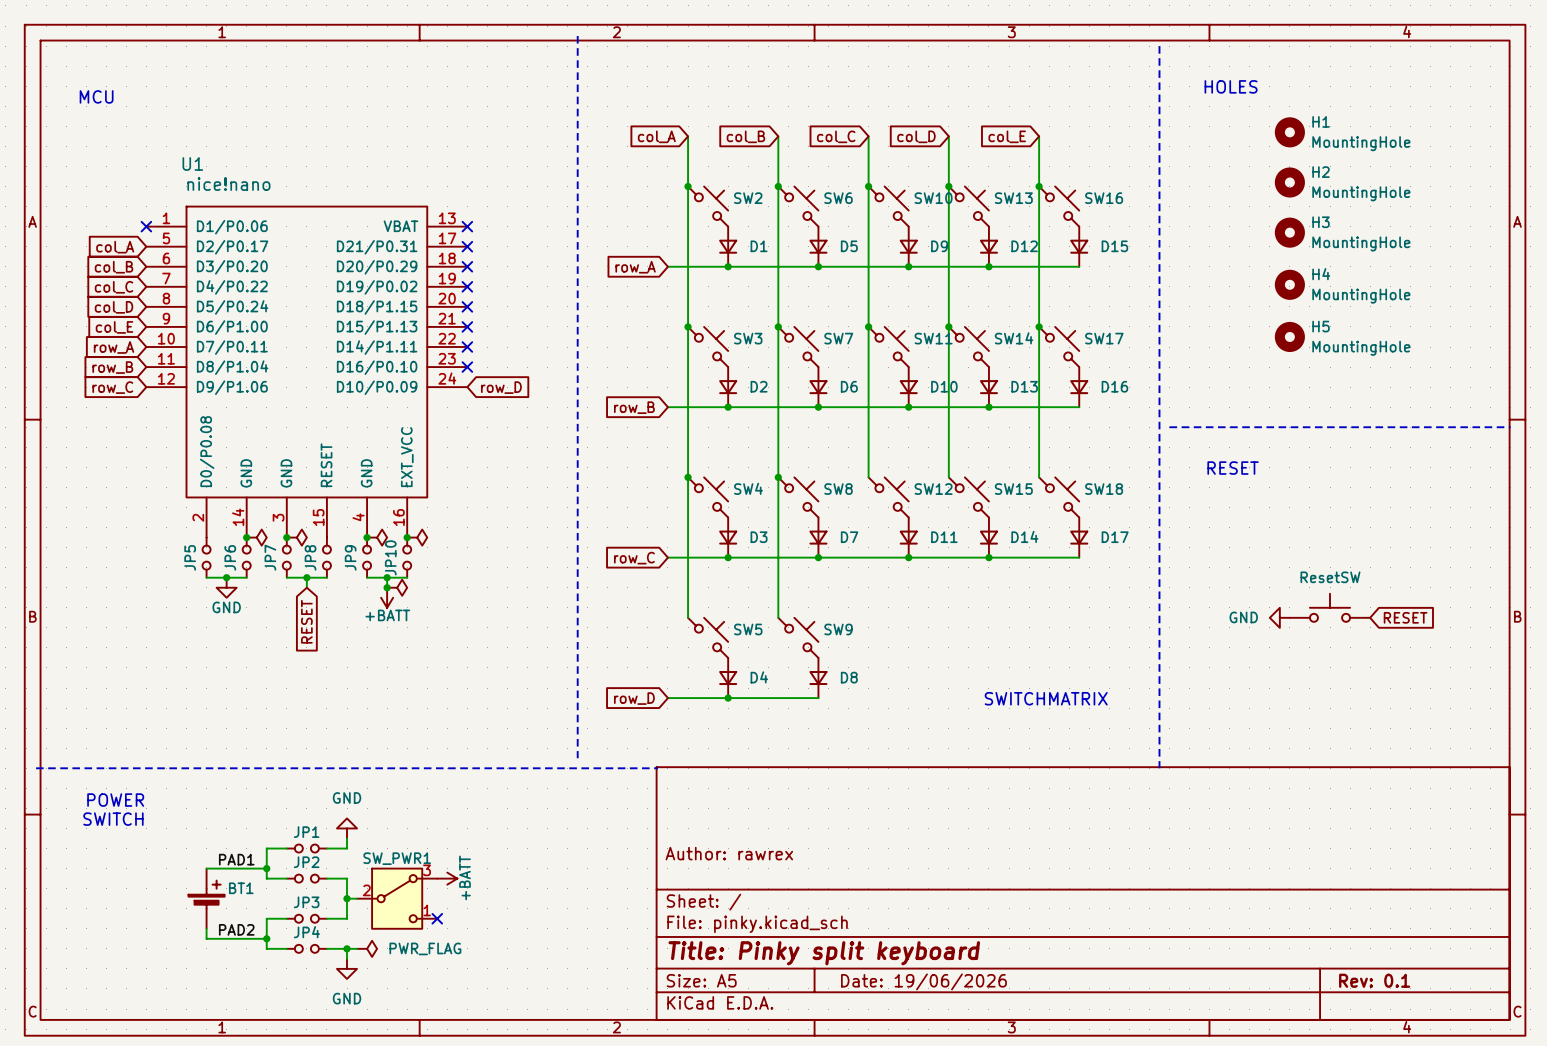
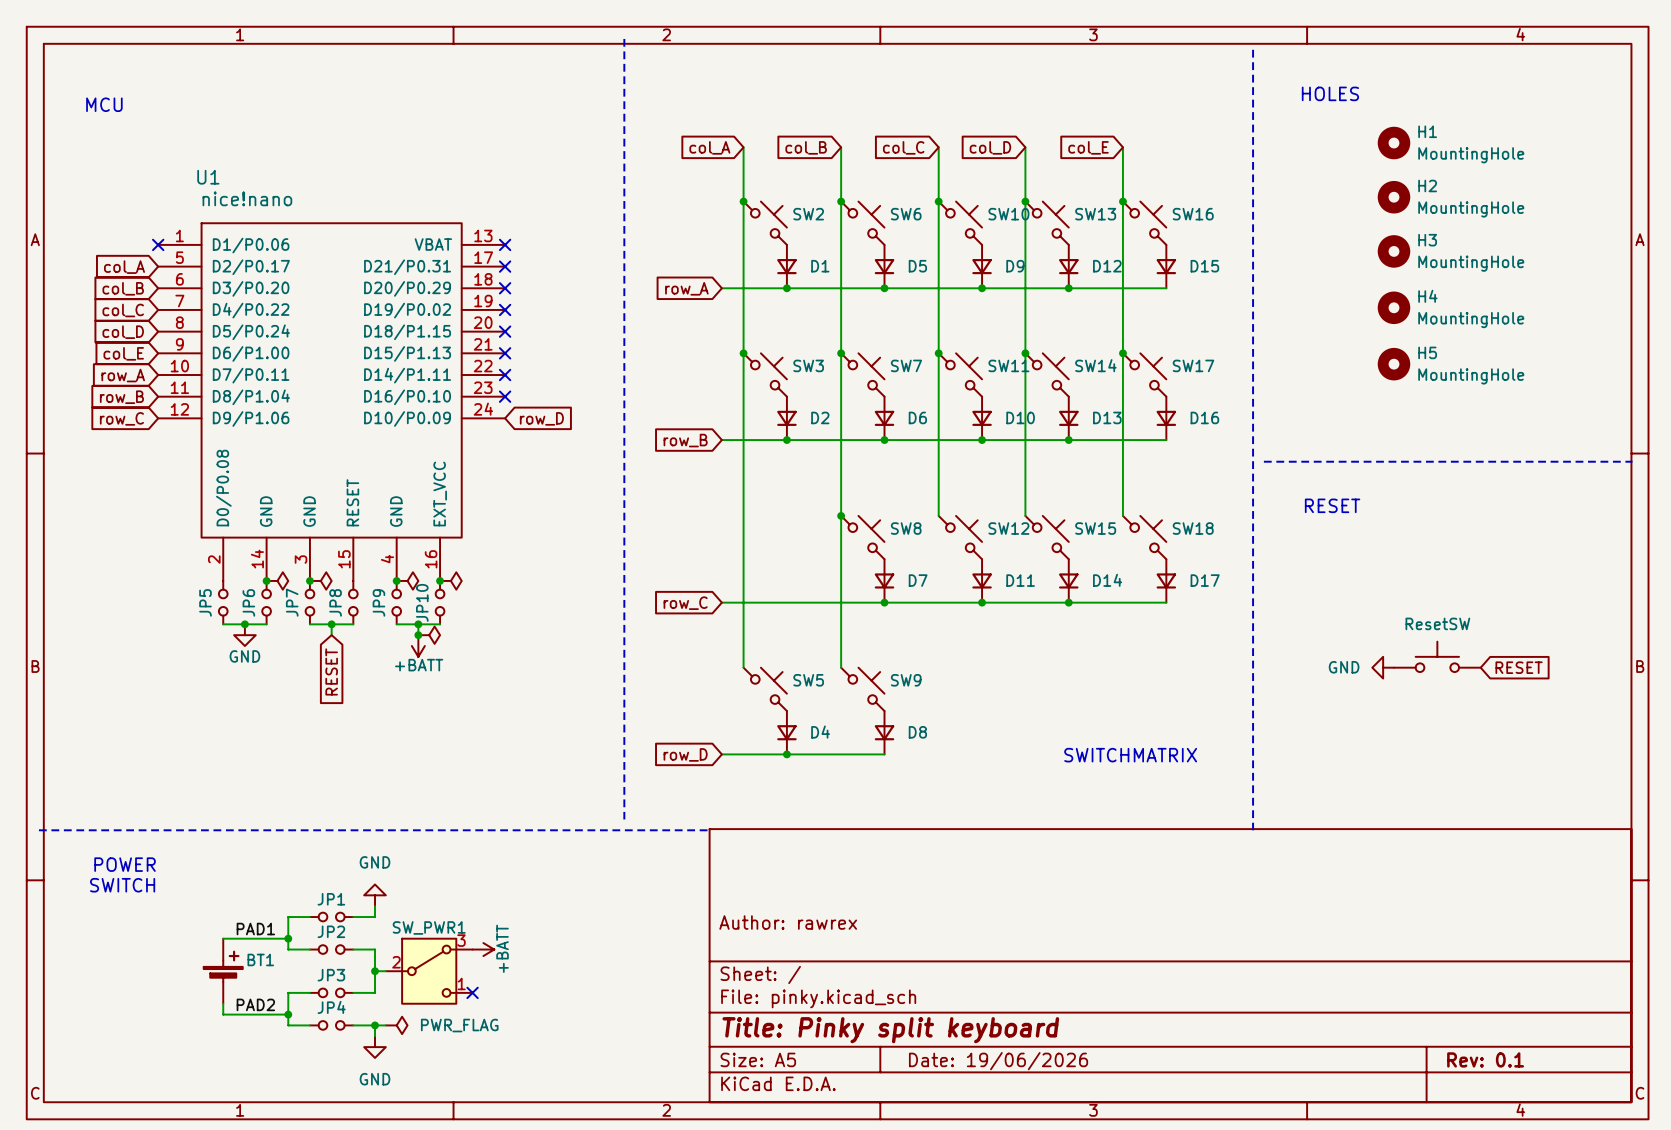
junction: (688, 477) -> none
SW4: (708, 497) -> none
D3: (728, 537) -> none
junction: (728, 557) -> none

